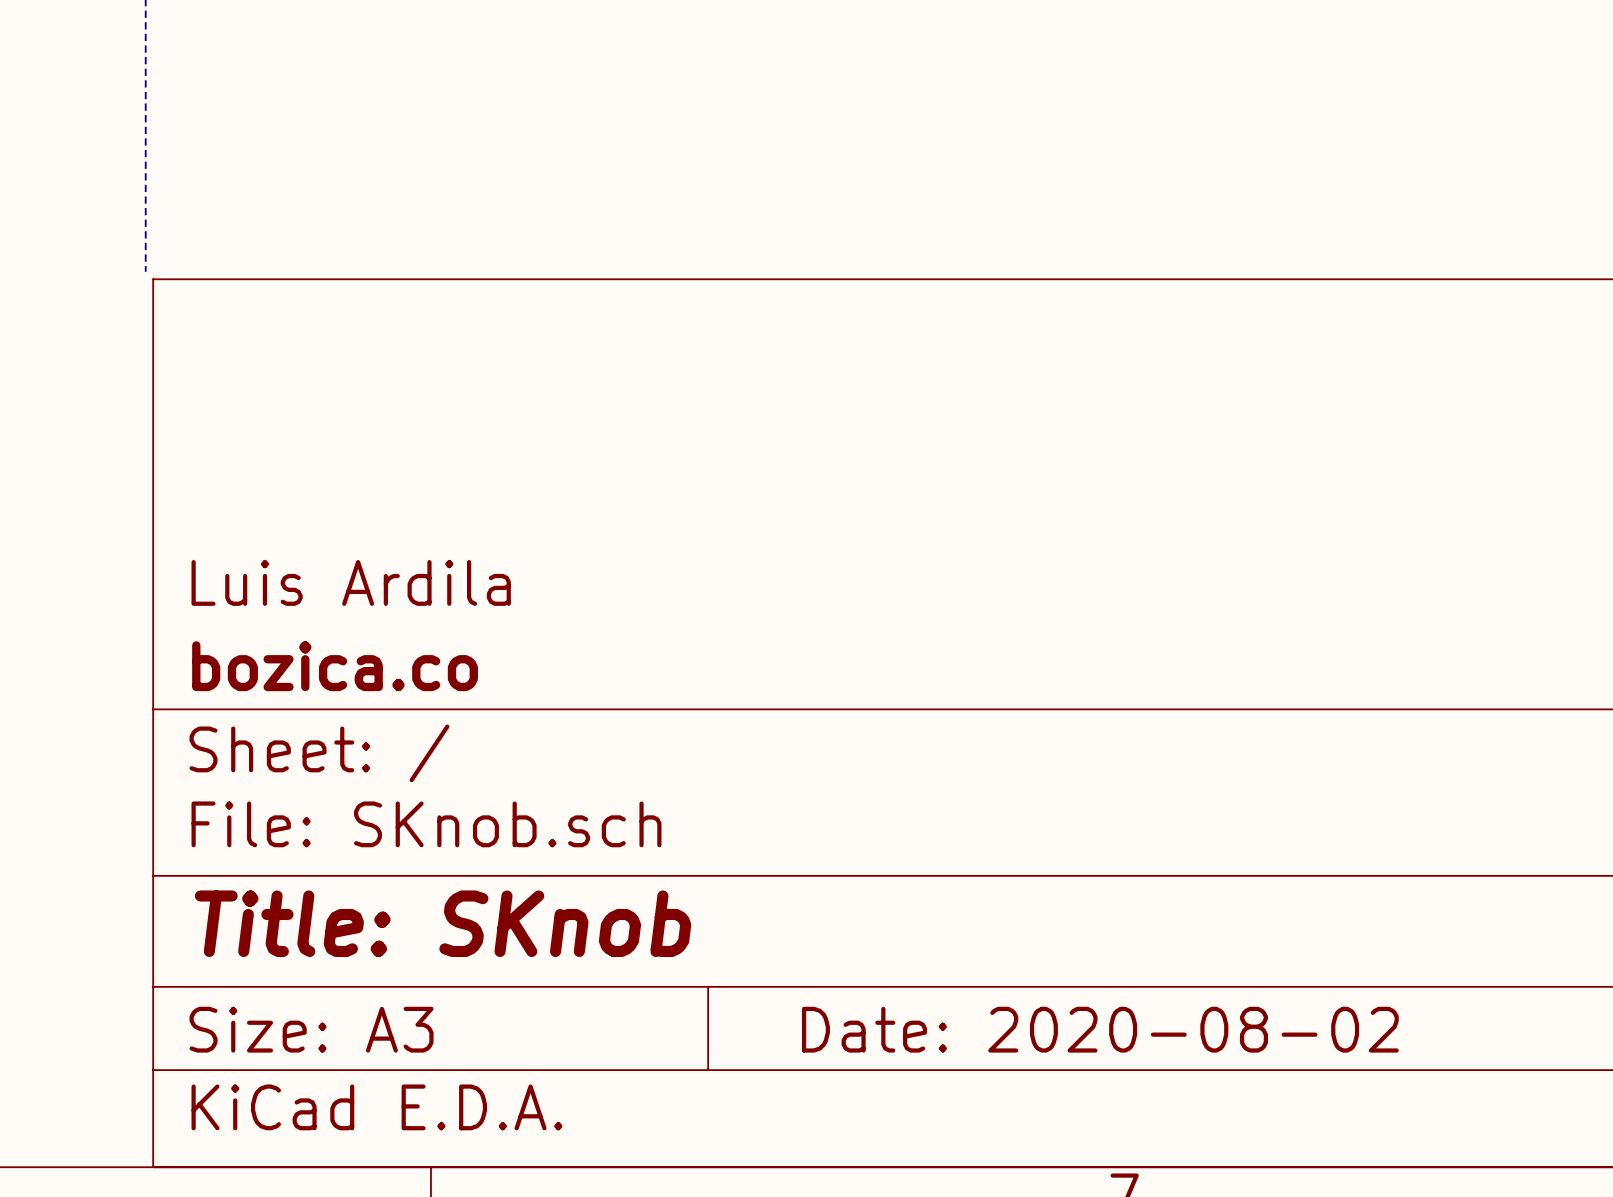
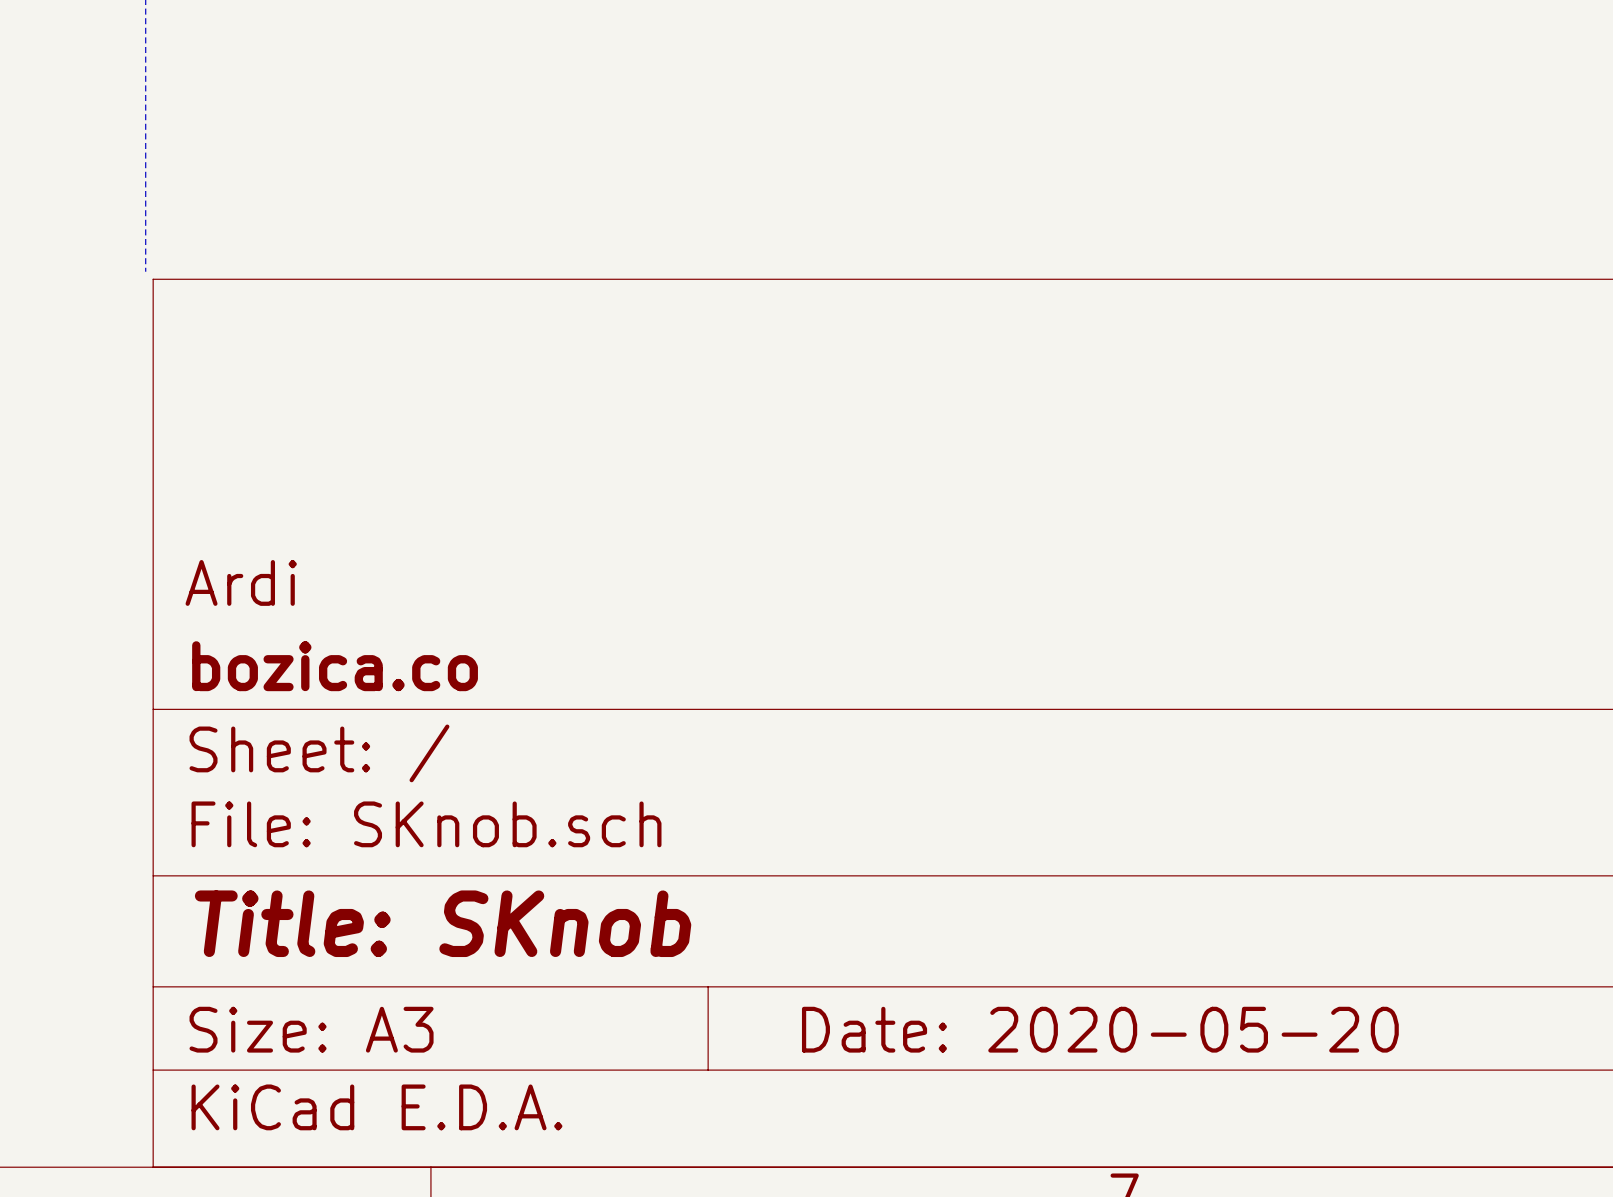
title block: Luis Ardila (351, 582) -> Ardi (241, 582)
title block: Date: 2020-08-02 (1100, 1029) -> Date: 2020-05-20 (1100, 1029)

